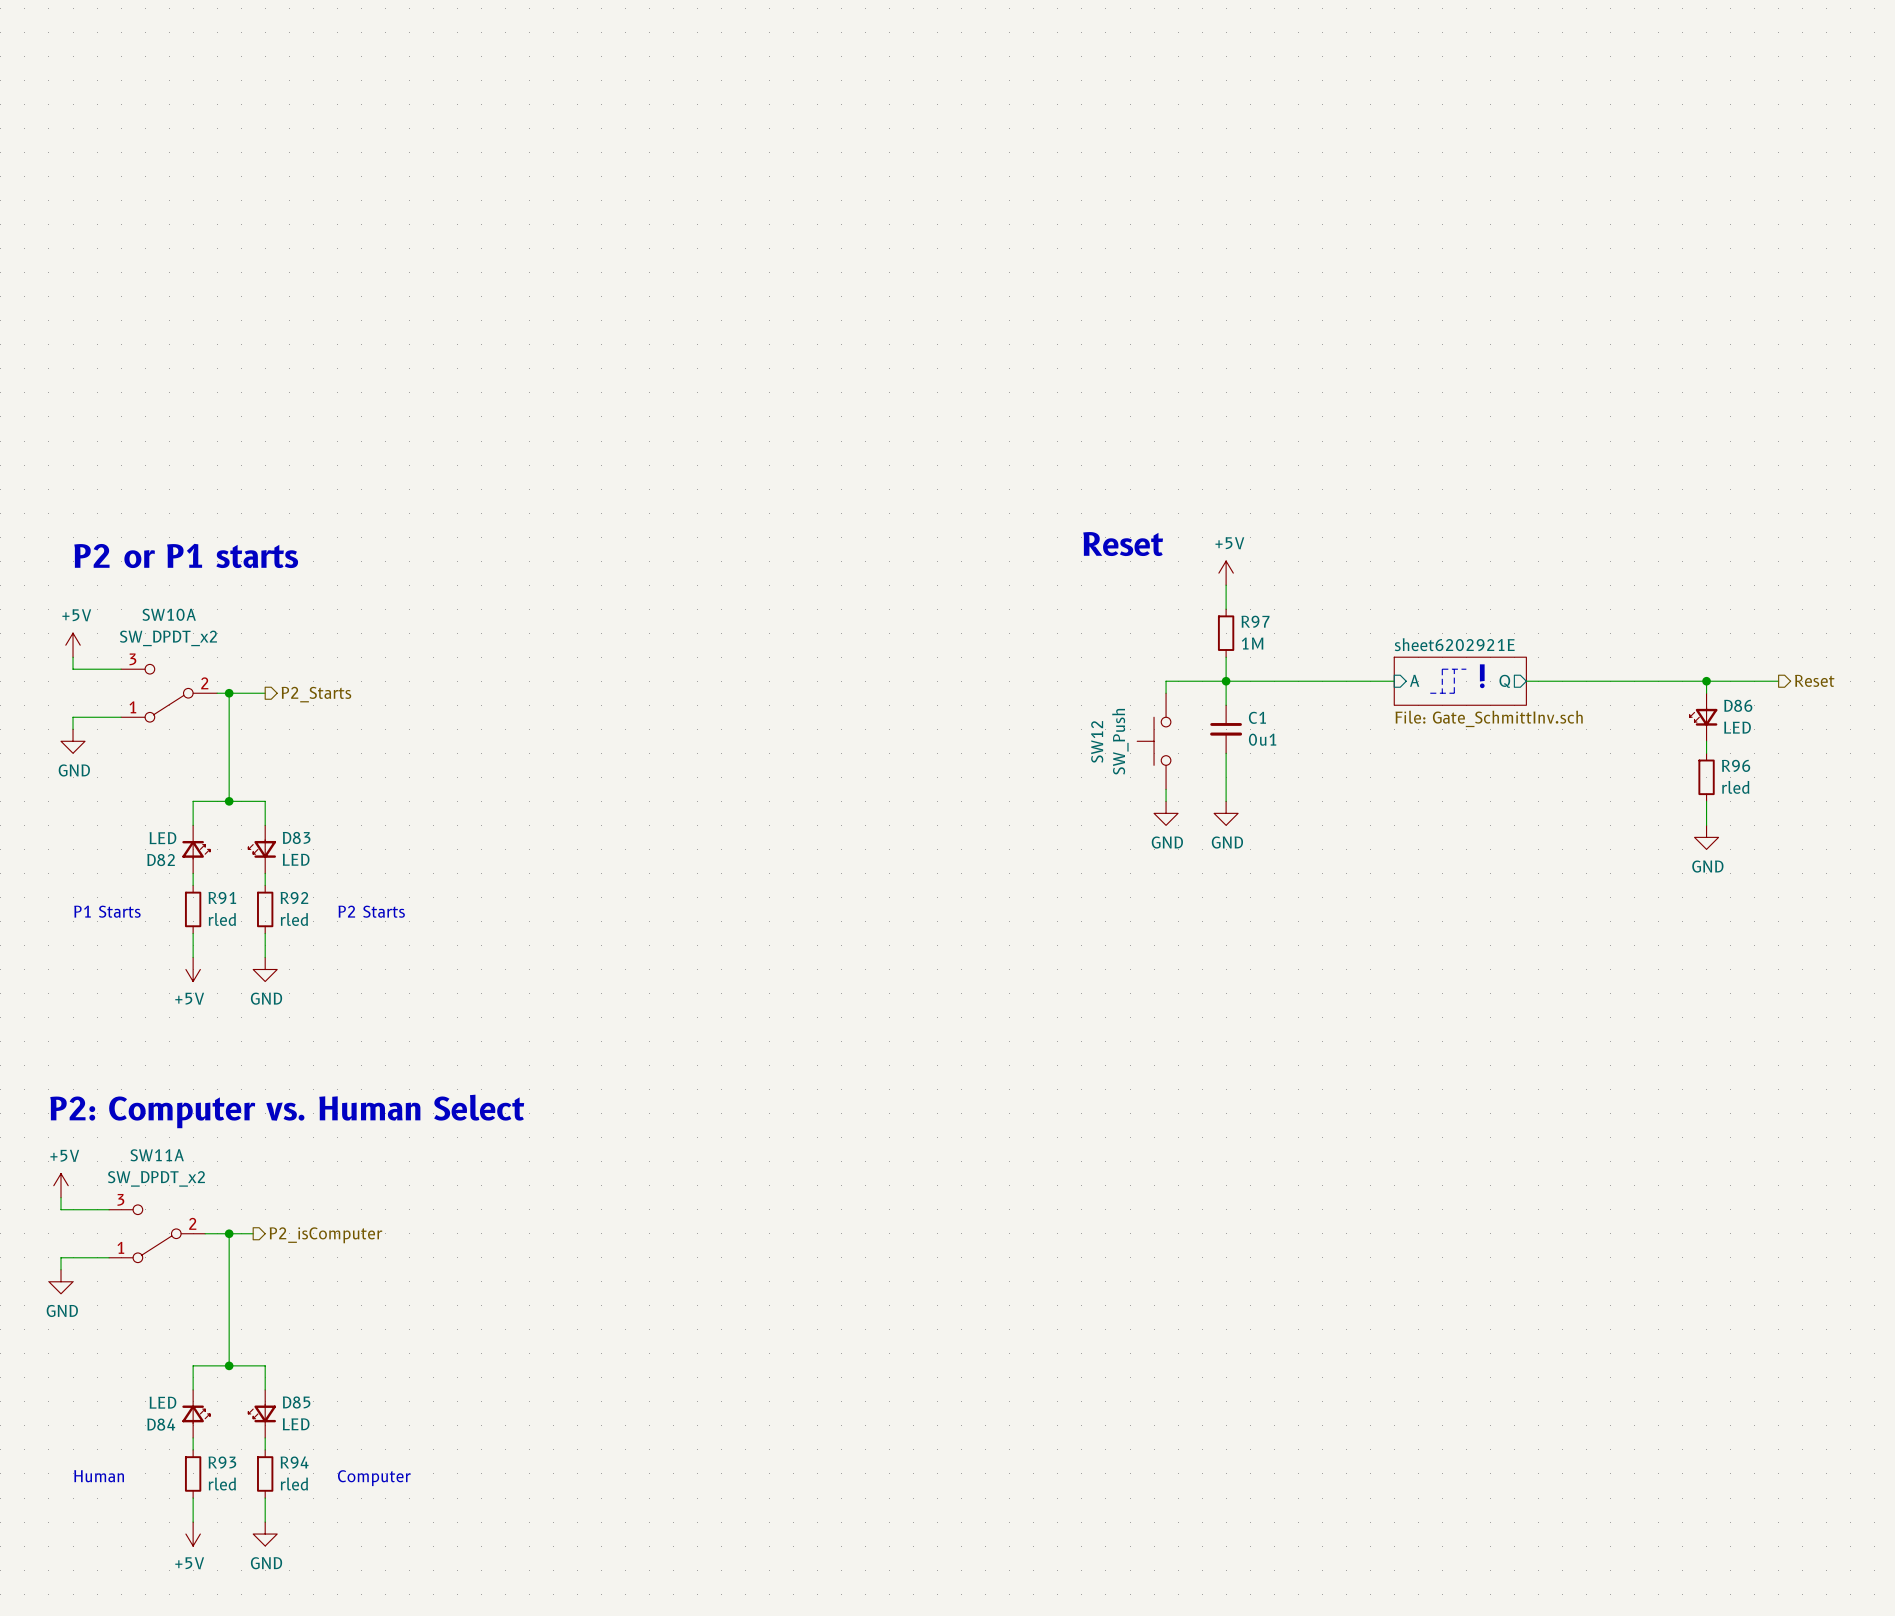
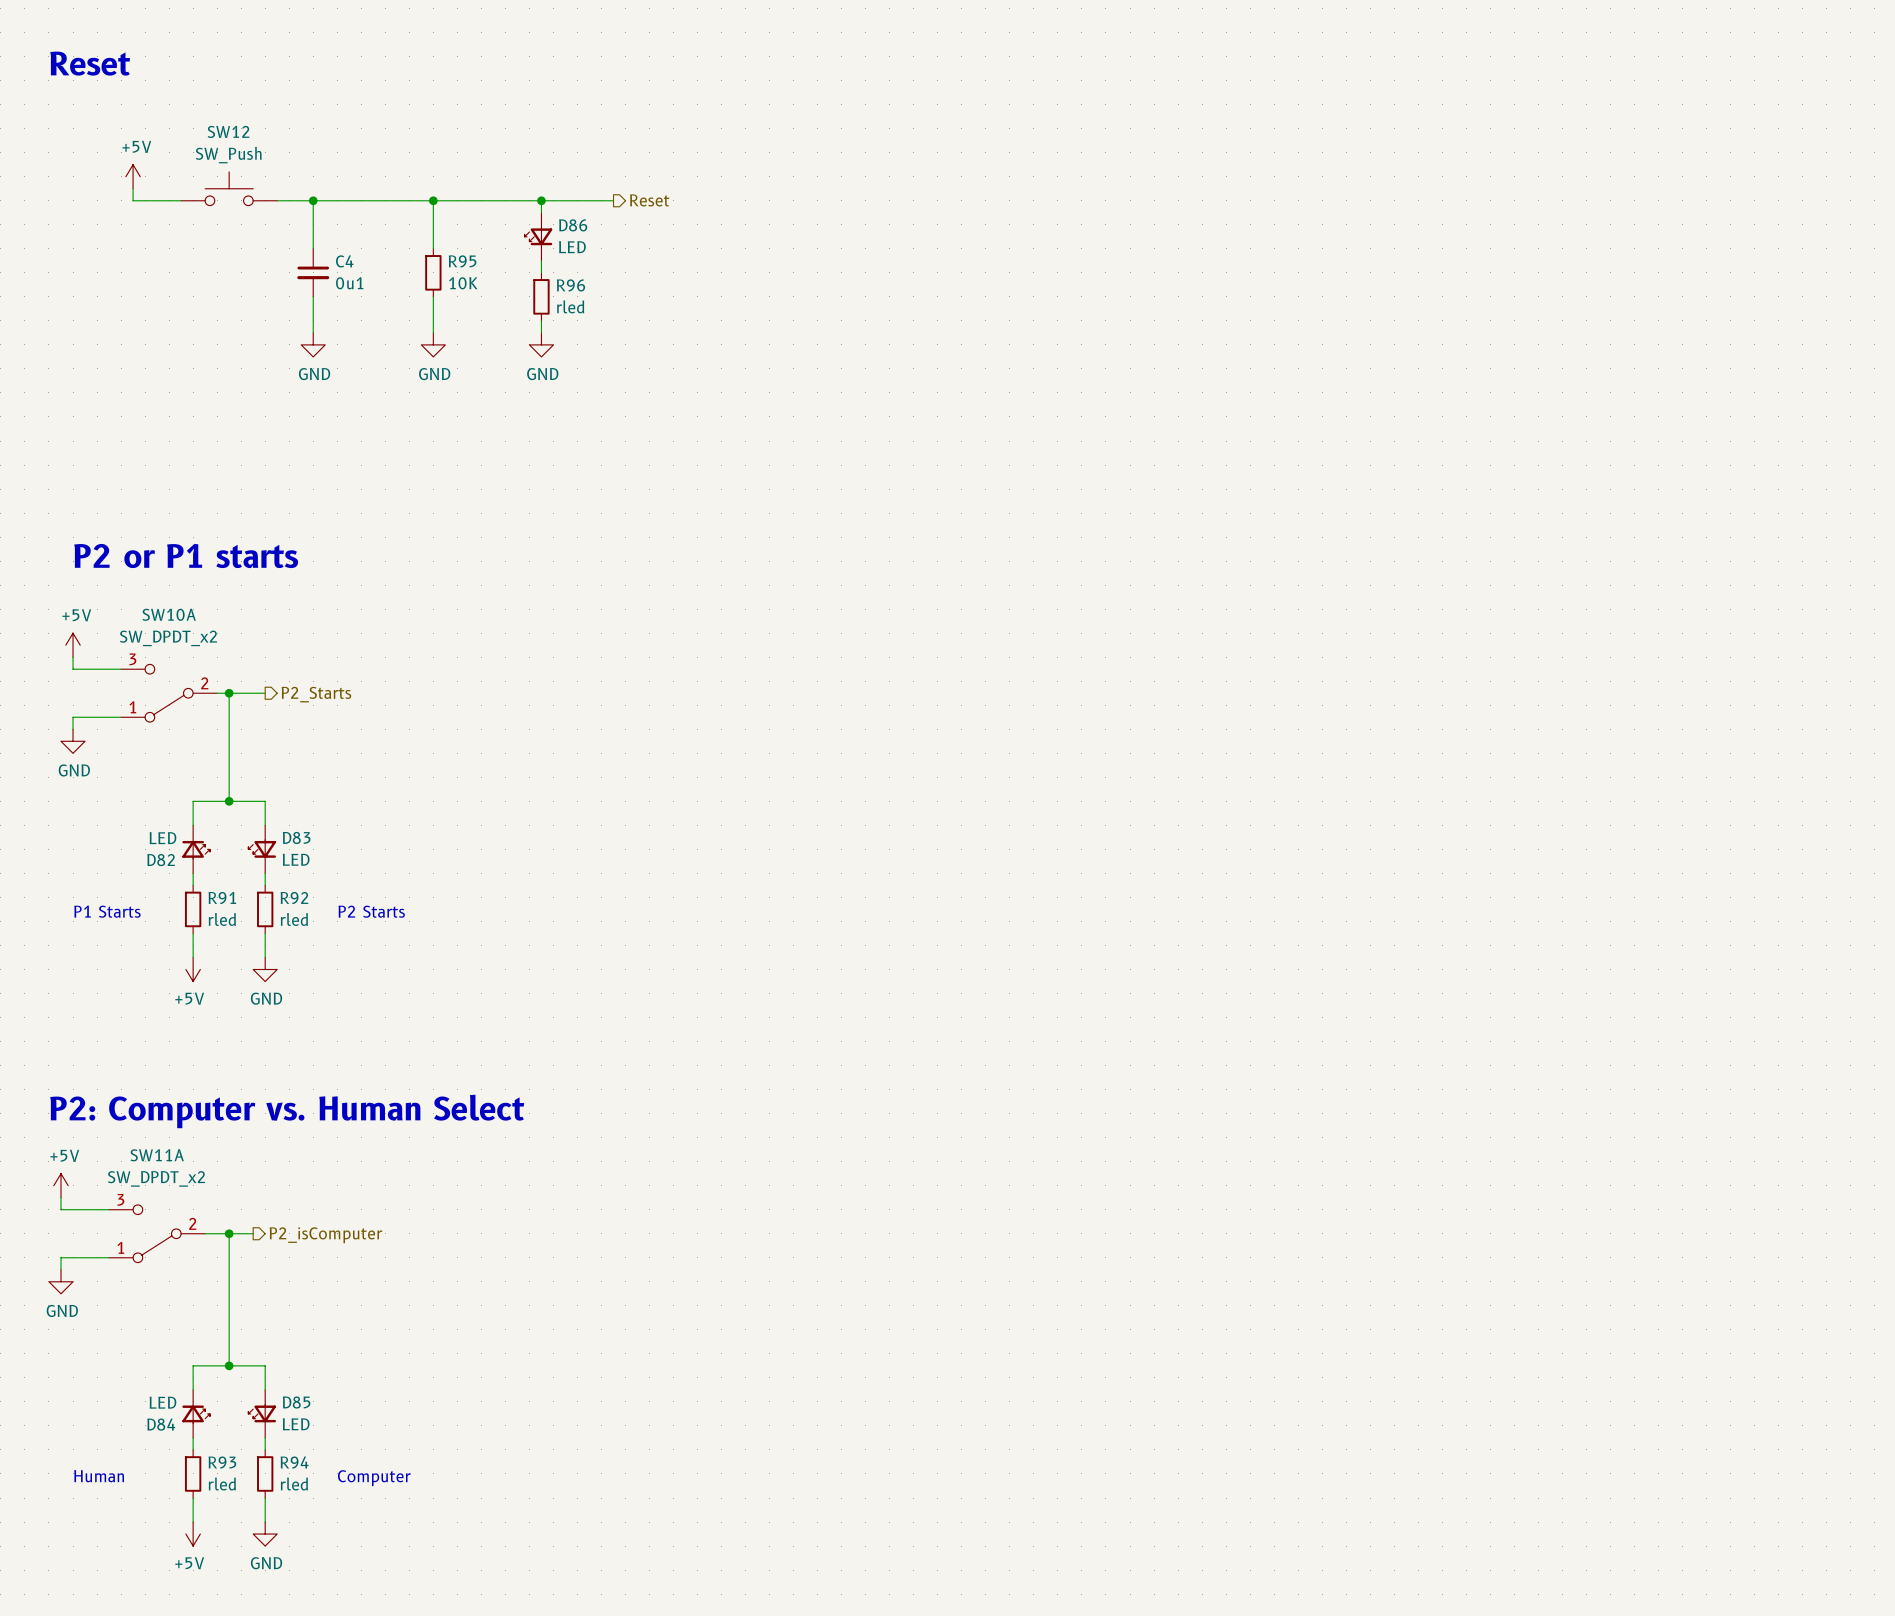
text: none -> Reset (90, 63)
power symbol: none -> +5V (133, 176)
wire: none -> (133, 188) (133, 200) (181, 200)
wire: none -> (277, 200) (613, 200)
wire: none -> (313, 200) (313, 248)
junction: none -> (313, 200)
wire: none -> (433, 200) (433, 248)
junction: none -> (433, 200)
wire: none -> (541, 200) (541, 212)
junction: none -> (541, 200)
hierarchical label: none -> Reset (649, 200)
wire: none -> (541, 260) (541, 272)
C4: none -> 0u1 (313, 272)
R95: none -> 10K (433, 272)
wire: none -> (313, 296) (313, 332)
wire: none -> (433, 296) (433, 332)
wire: none -> (541, 320) (541, 332)
power symbol: none -> GND (313, 344)
power symbol: none -> GND (433, 344)
power symbol: none -> GND (541, 344)
text: Reset (1123, 544) -> none
power symbol: +5V (1226, 573) -> none
wire: (1226, 585) (1226, 609) -> none
R97: 1M (1226, 633) -> none
wire: (1226, 657) (1226, 705) -> none
line: (1454, 669) (1454, 693) (1430, 693) -> none
line: (1466, 669) (1442, 669) (1442, 693) -> none
text: ! (1482, 676) -> none
sheet pin: A (1414, 680) -> none
hierarchical label: Reset (1814, 680) -> none
junction: (1226, 681) -> none
wire: (1394, 681) (1166, 681) (1166, 693) -> none
sheet sheet6202921E: File: Gate_SchmittInv.sch (1460, 681) -> none
sheet pin: Q (1504, 681) -> none
wire: (1526, 681) (1778, 681) -> none
wire: (1706, 681) (1706, 693) -> none
junction: (1706, 681) -> none
D86 position: (1703, 717) -> (538, 236)
C1: 0u1 (1226, 729) -> none
SW12 rotation: 0° (1154, 741) -> 90° clockwise (229, 188)
SW12 position: (1154, 741) -> (229, 188)
wire: (1706, 741) (1706, 753) -> none
wire: (1226, 753) (1226, 801) -> none
R96 position: (1706, 777) -> (541, 296)
wire: (1166, 789) (1166, 801) -> none
wire: (1706, 801) (1706, 825) -> none
power symbol: GND (1166, 813) -> none
power symbol: GND (1226, 813) -> none
power symbol: GND (1706, 837) -> none

